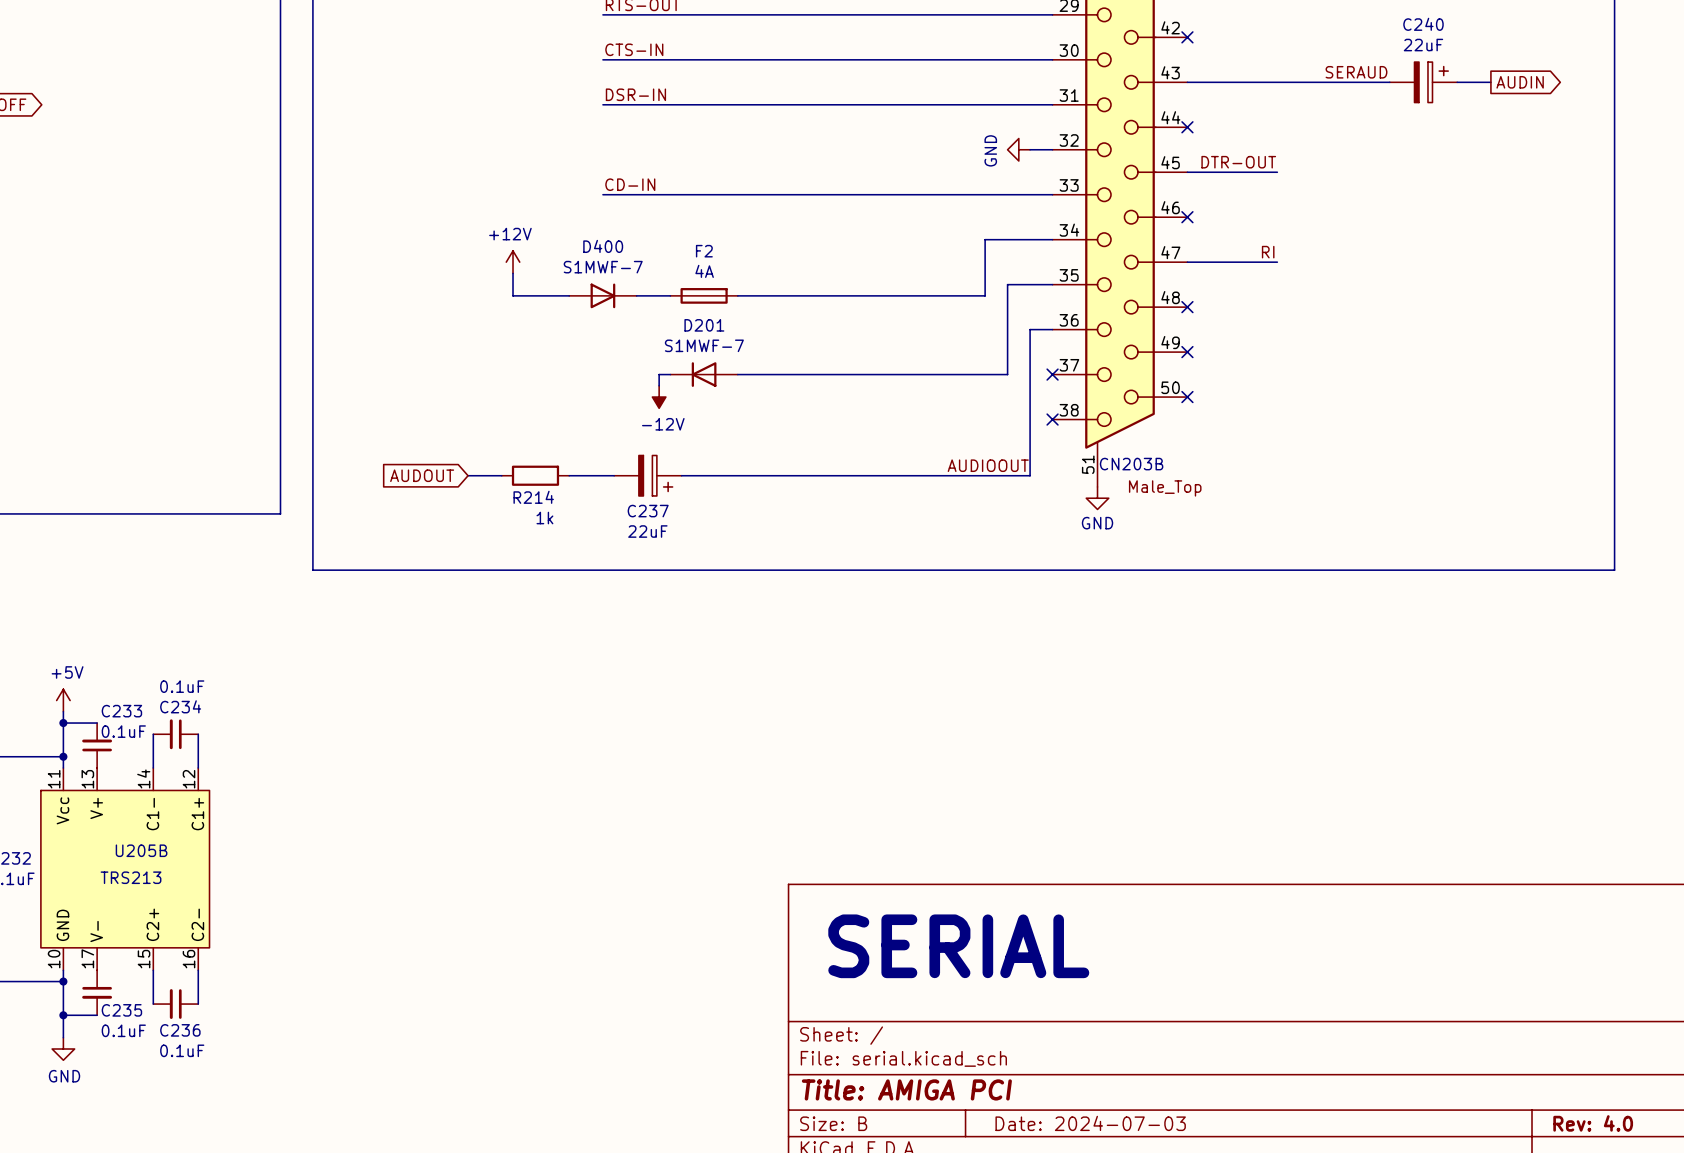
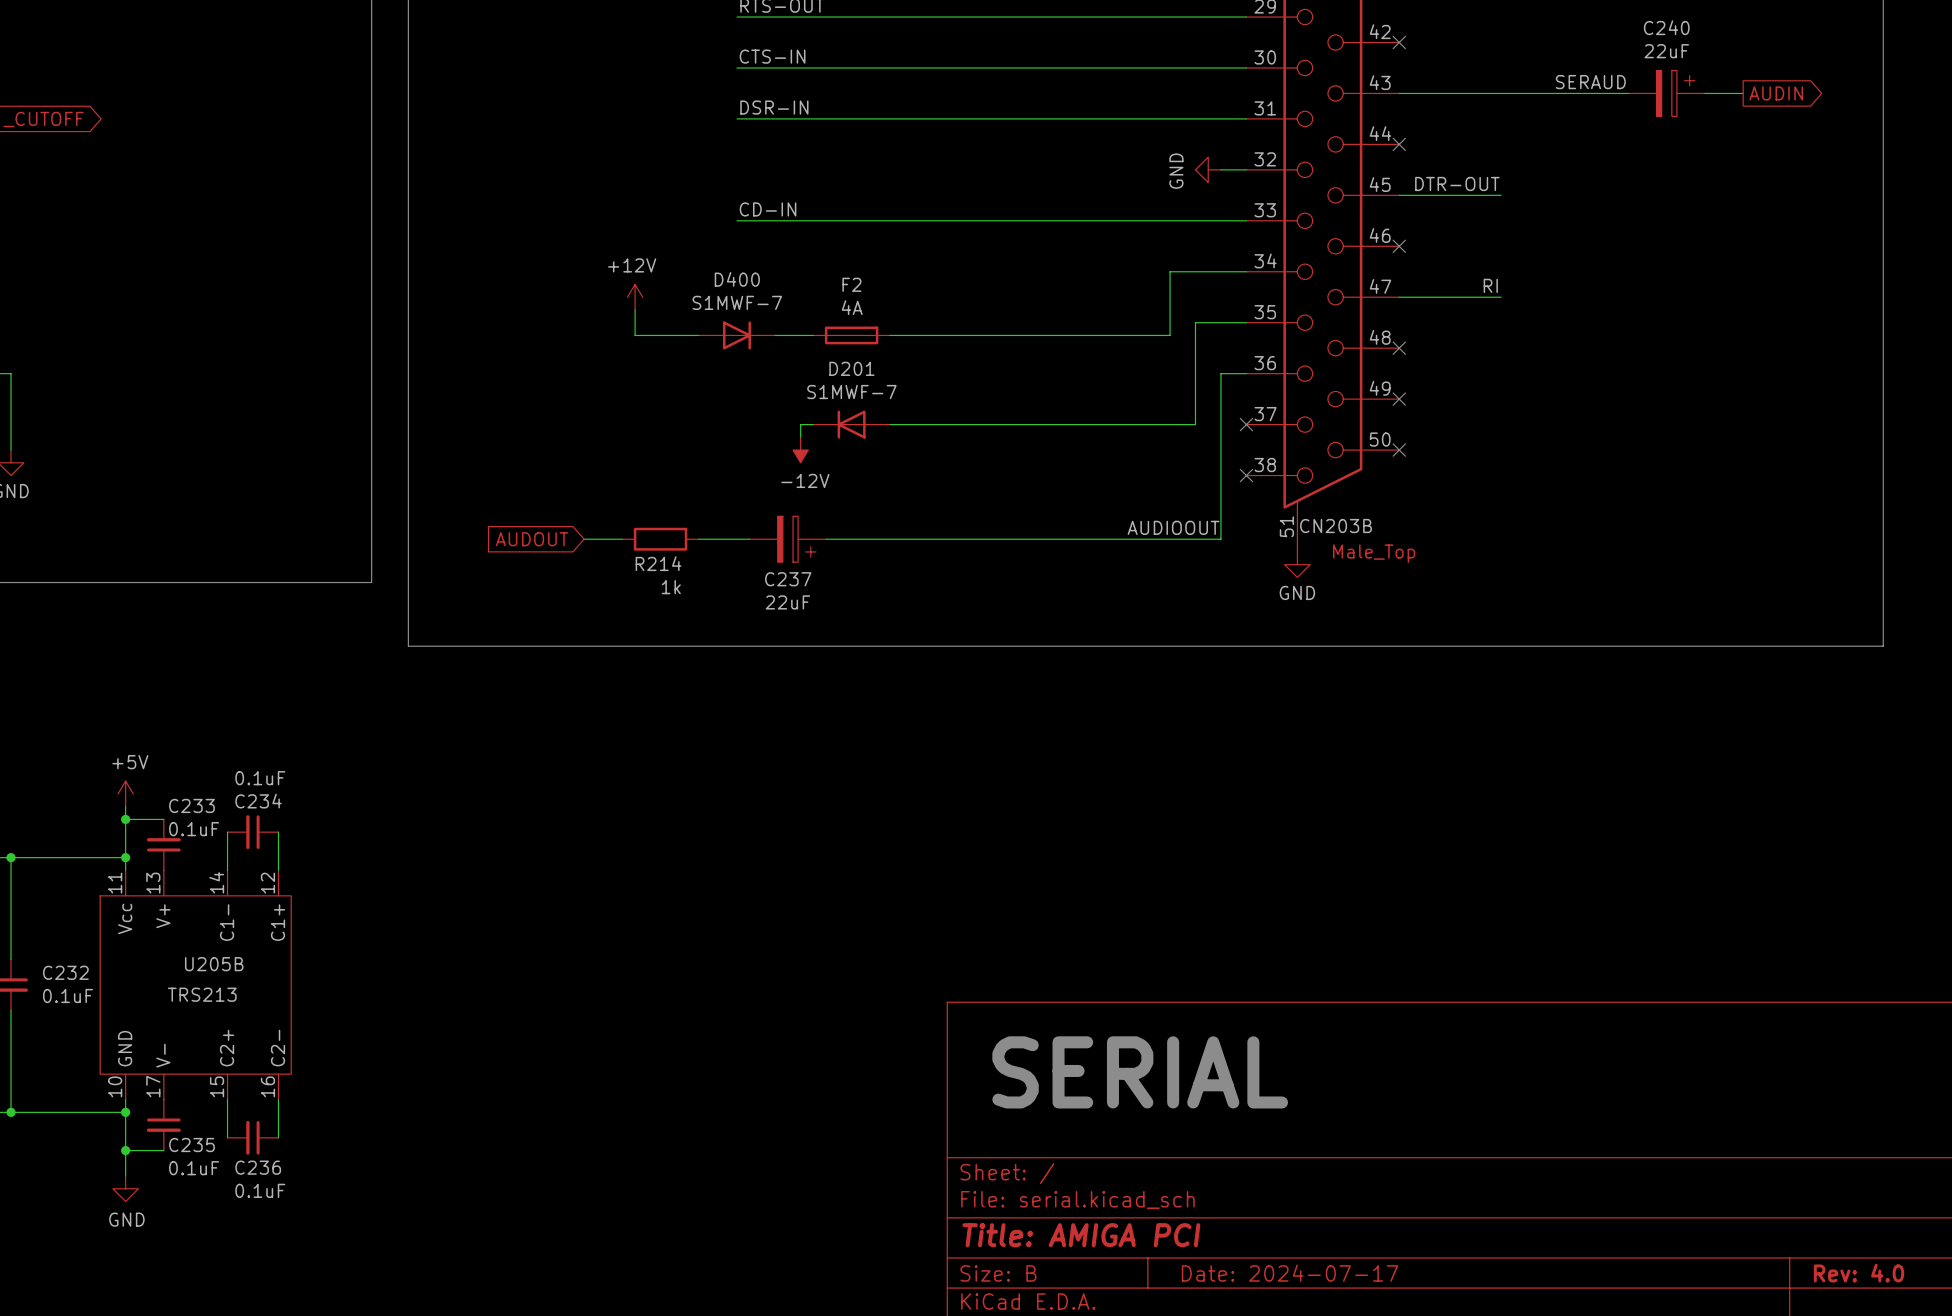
title block: Date: 2024-07-03 (1090, 1123) -> Date: 2024-07-17 (1289, 1273)

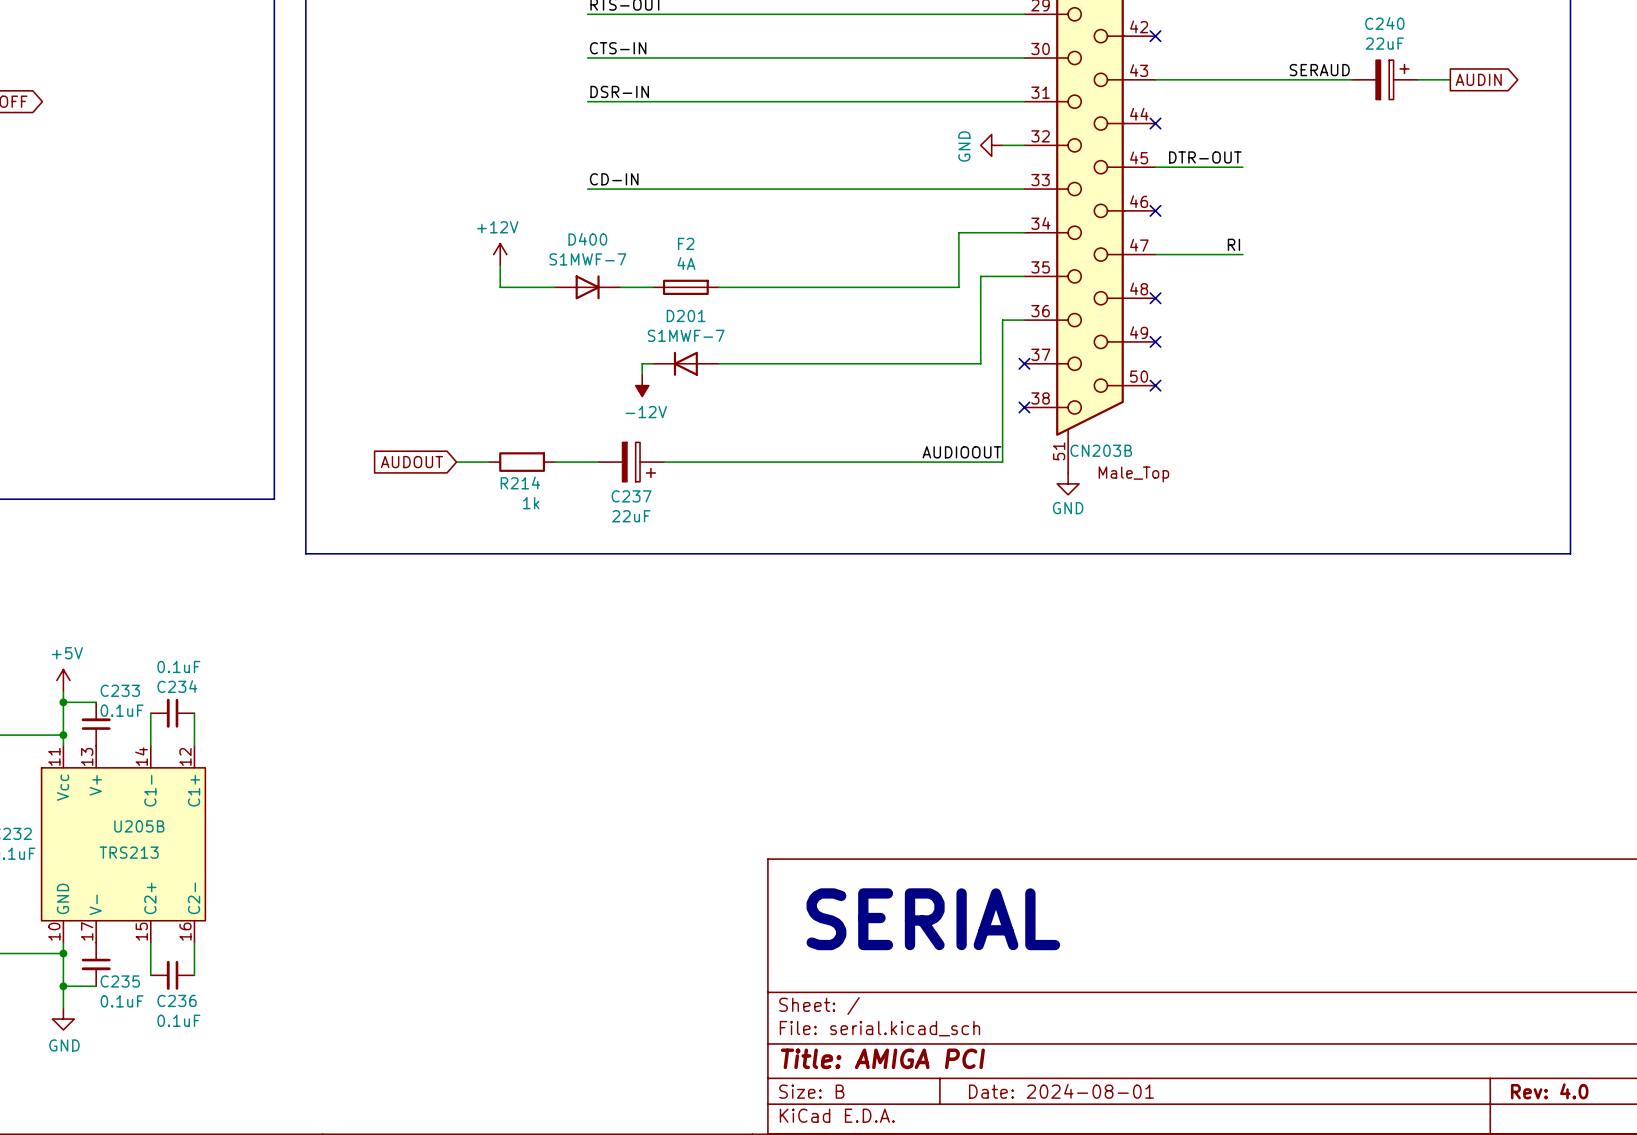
title block: Date: 2024-07-17 (1289, 1273) -> Date: 2024-08-01 (1061, 1091)

